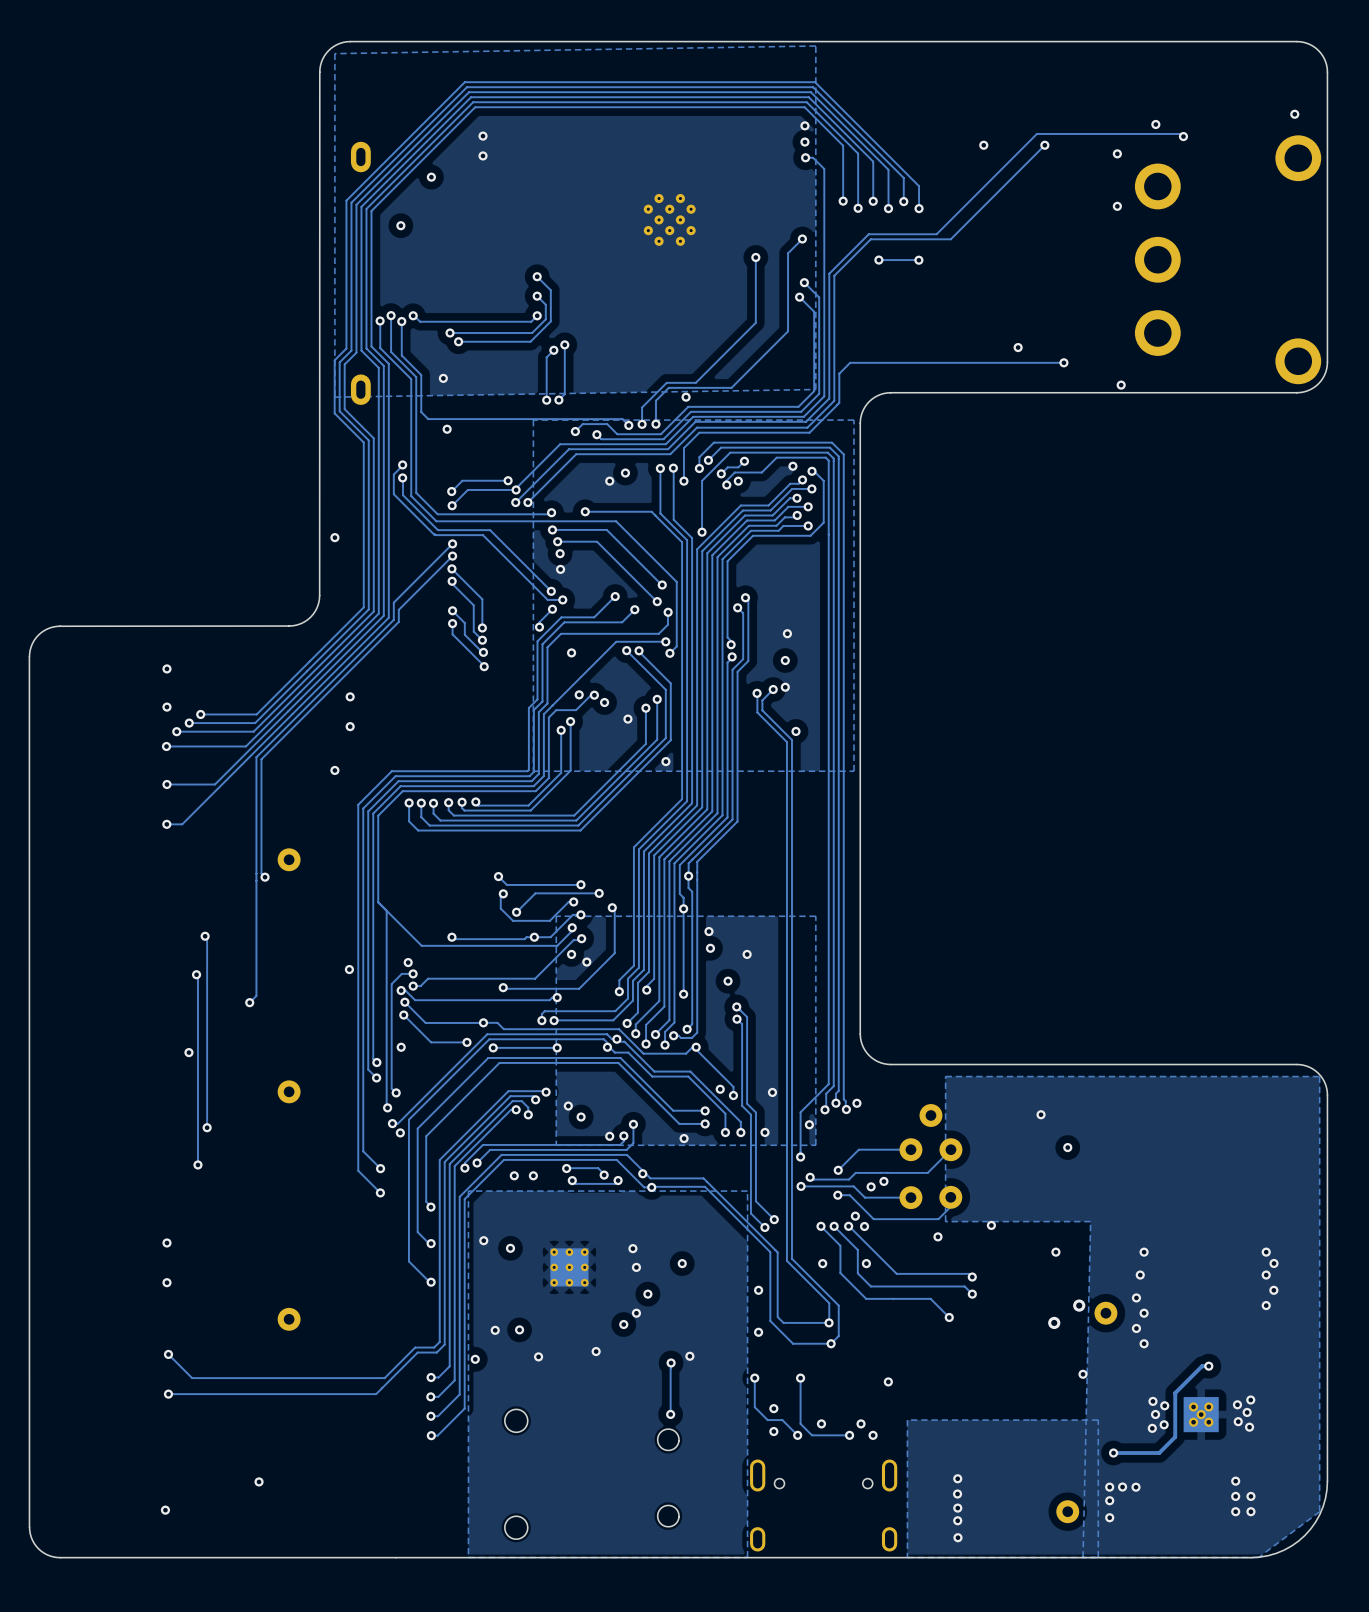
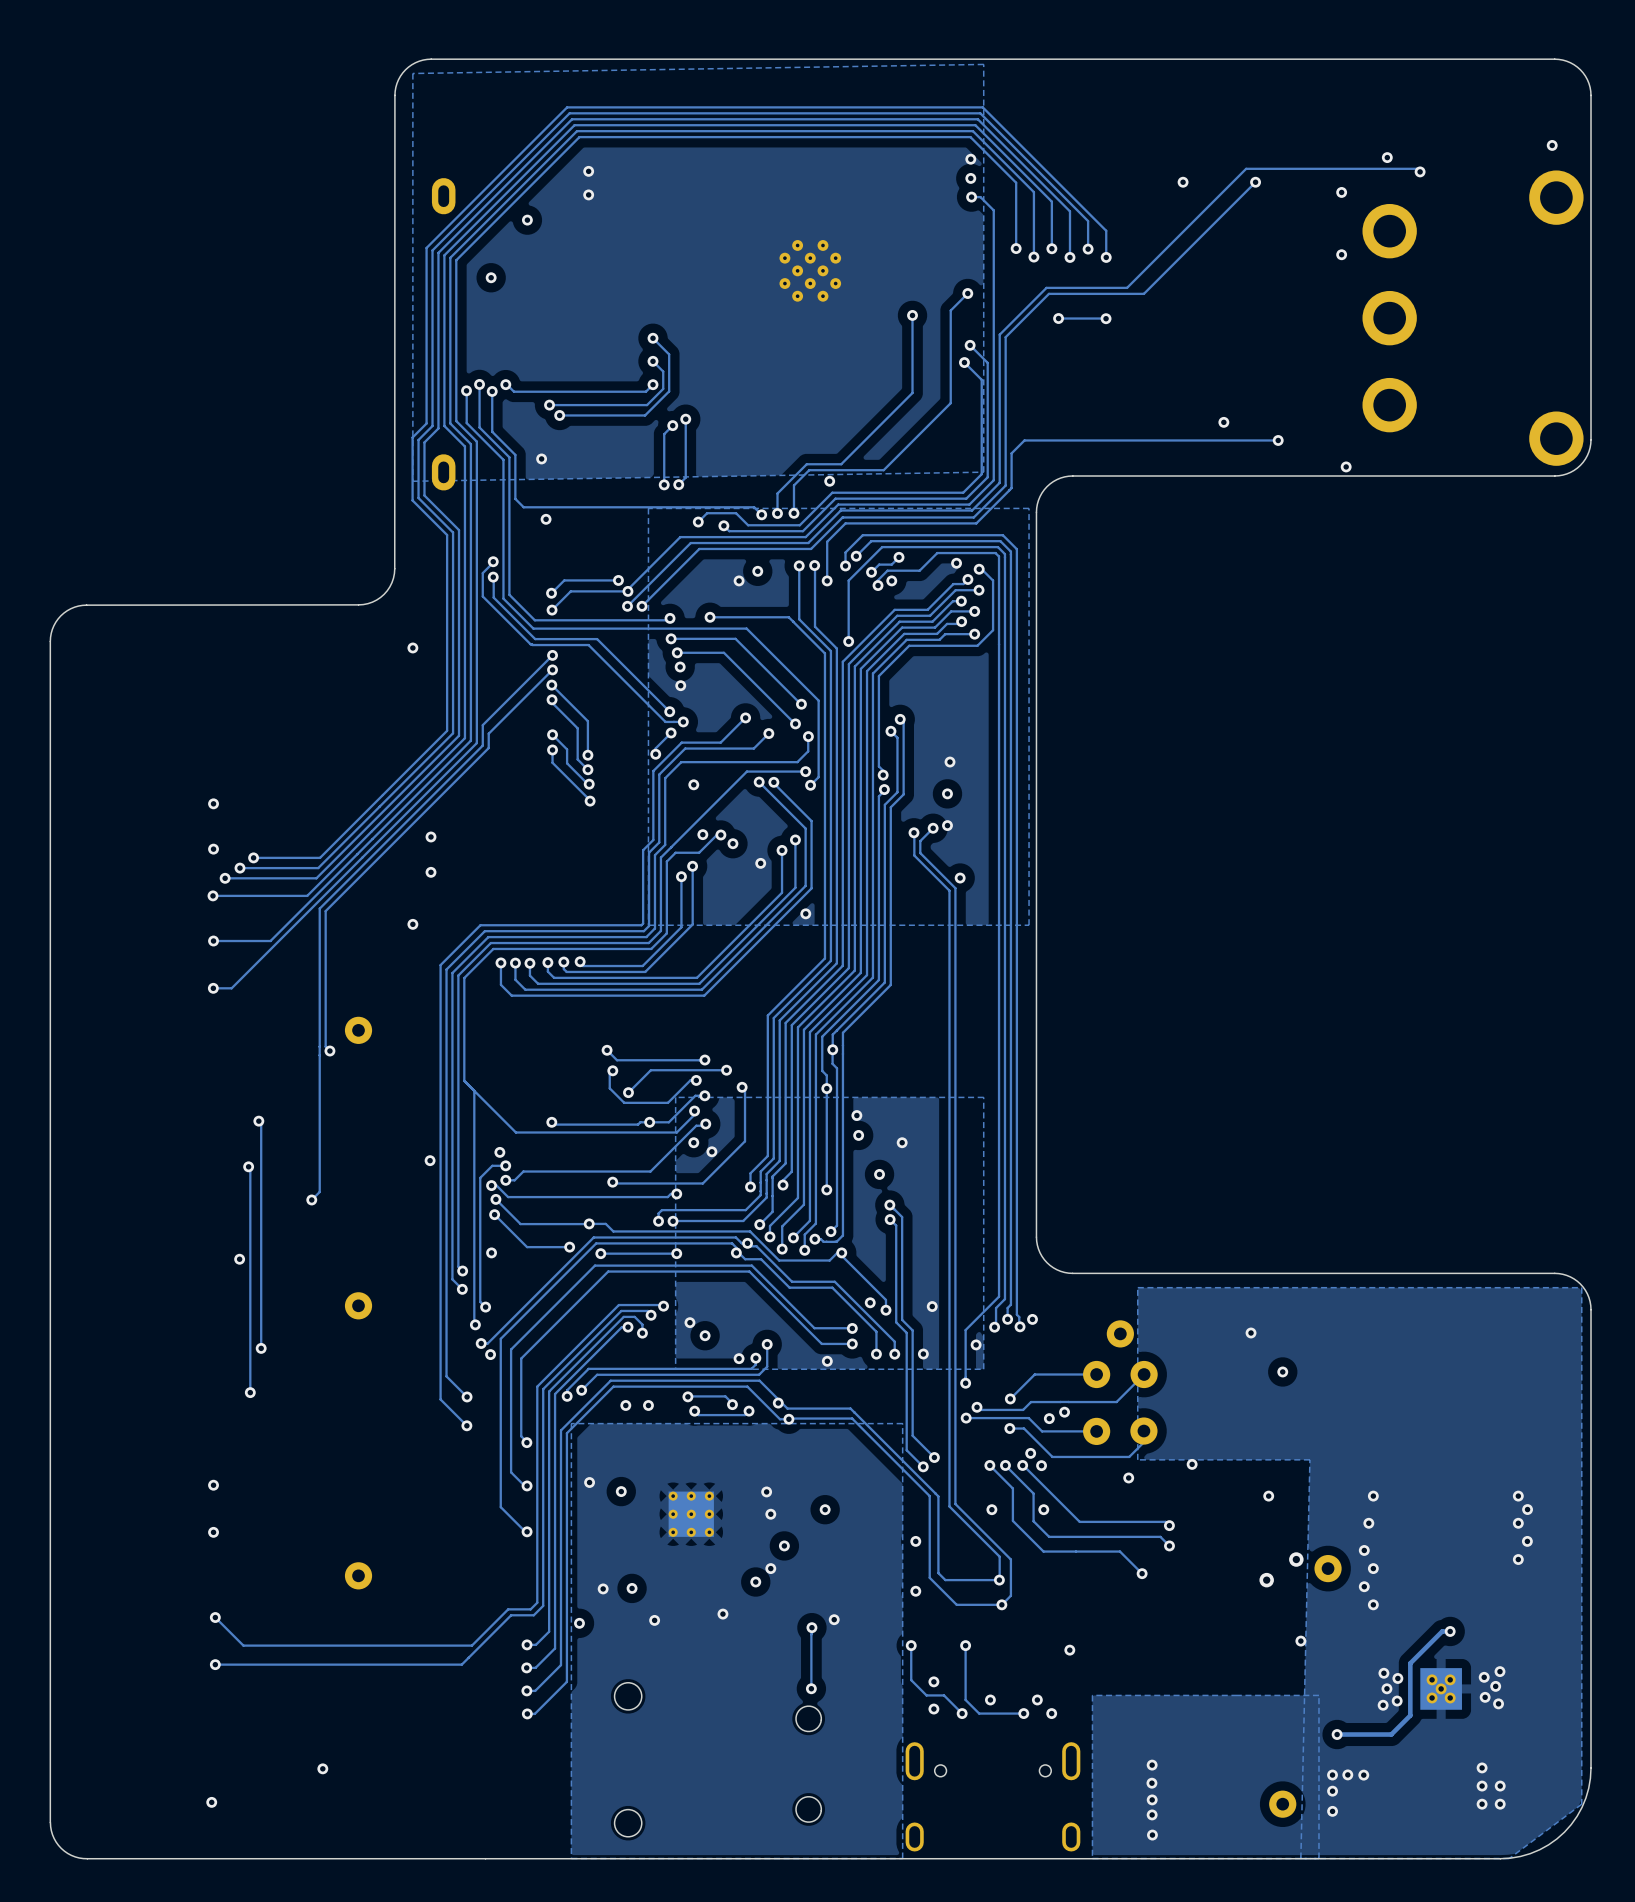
board edge: (319, 72) (319, 595) (317, 607) (310, 617) (300, 623) (289, 626) -> (394, 95) (394, 573) (389, 586) (380, 597) (372, 602) (358, 604)
board edge: (289, 626) (56, 626) (40, 632) (31, 646) (29, 656) (29, 1527) -> (358, 604) (82, 605) (70, 608) (60, 615) (51, 633) (50, 1822)

